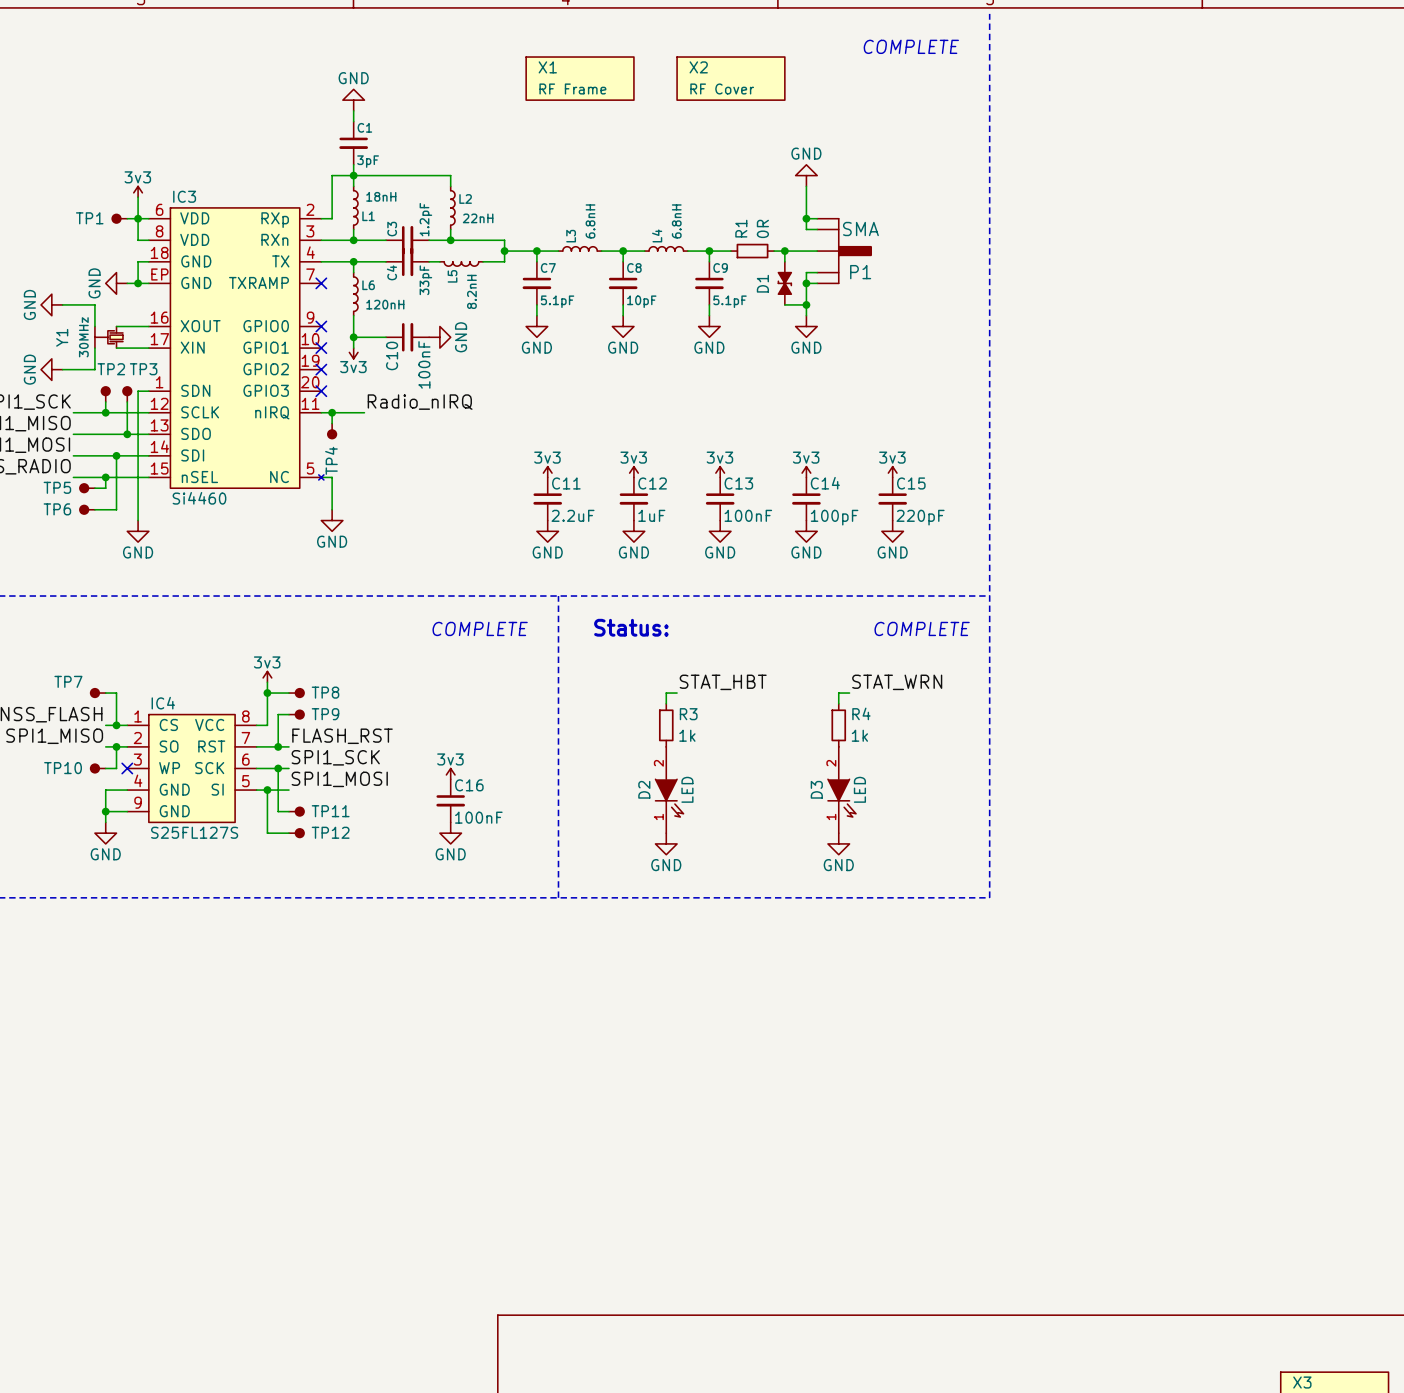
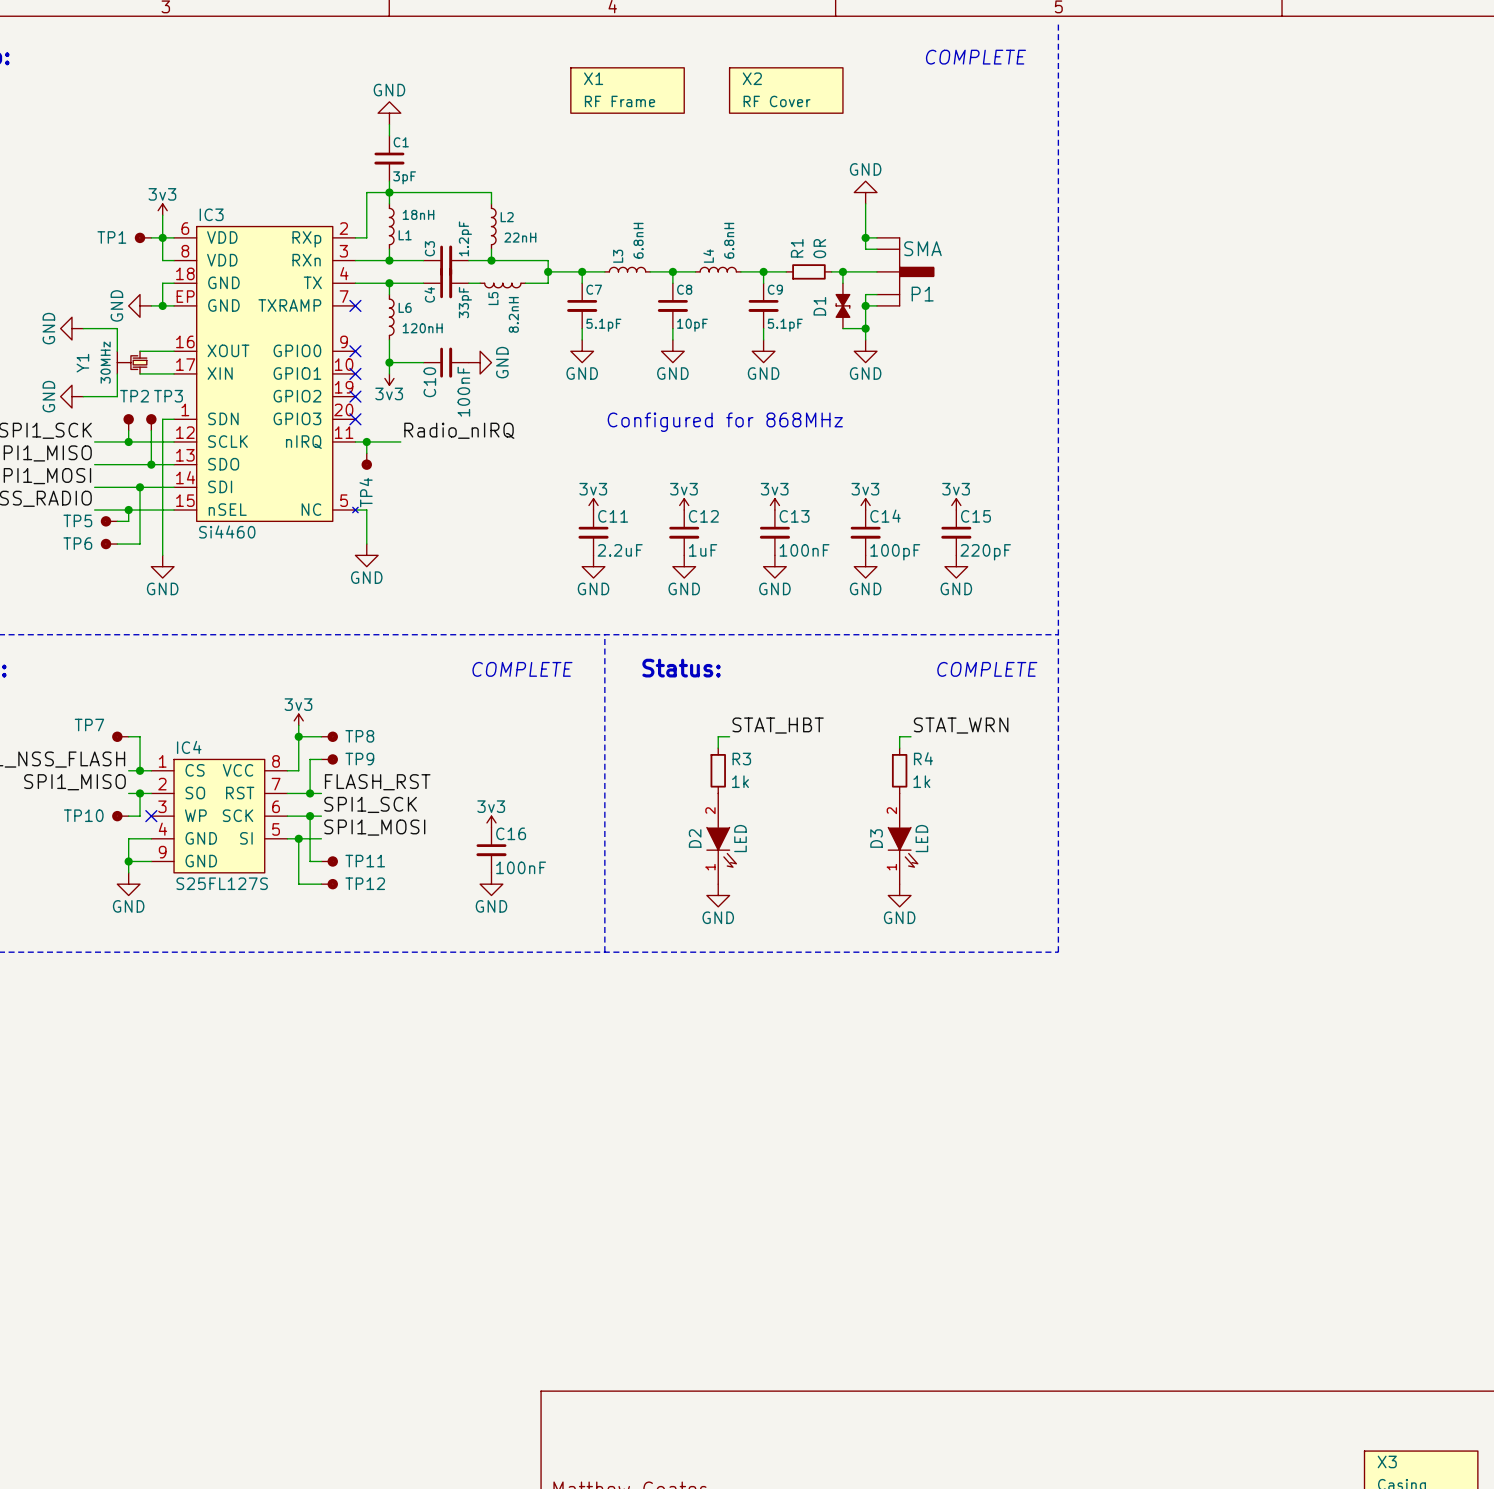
text: none -> Configured for 868MHz (725, 422)

